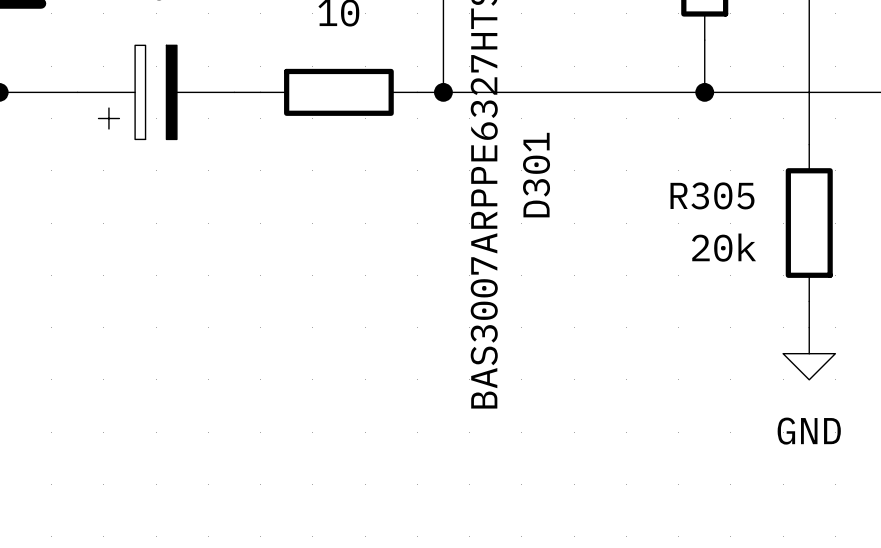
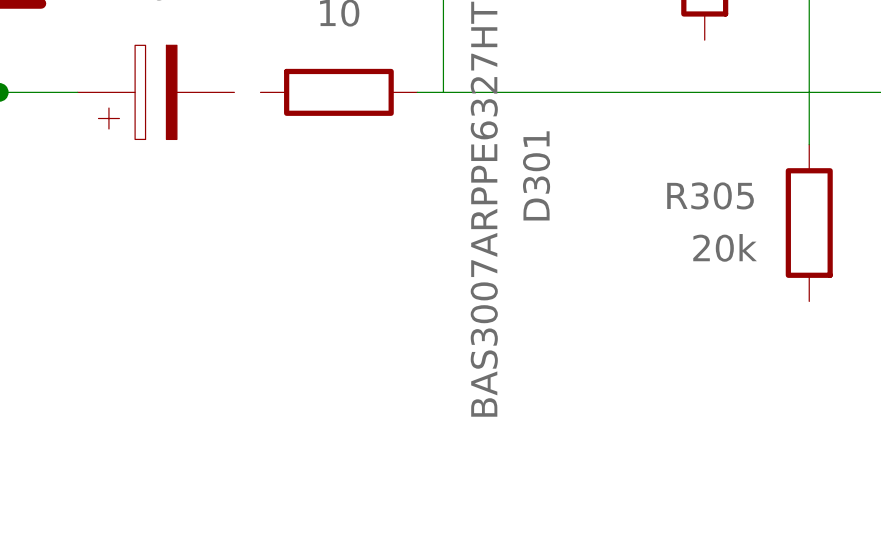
wire: (704, 40) (704, 92) -> none
wire: (234, 92) (260, 92) -> none
junction: (443, 92) -> none
junction: (704, 92) -> none
wire: (809, 301) (809, 327) -> none
power symbol: GND (809, 353) -> none

